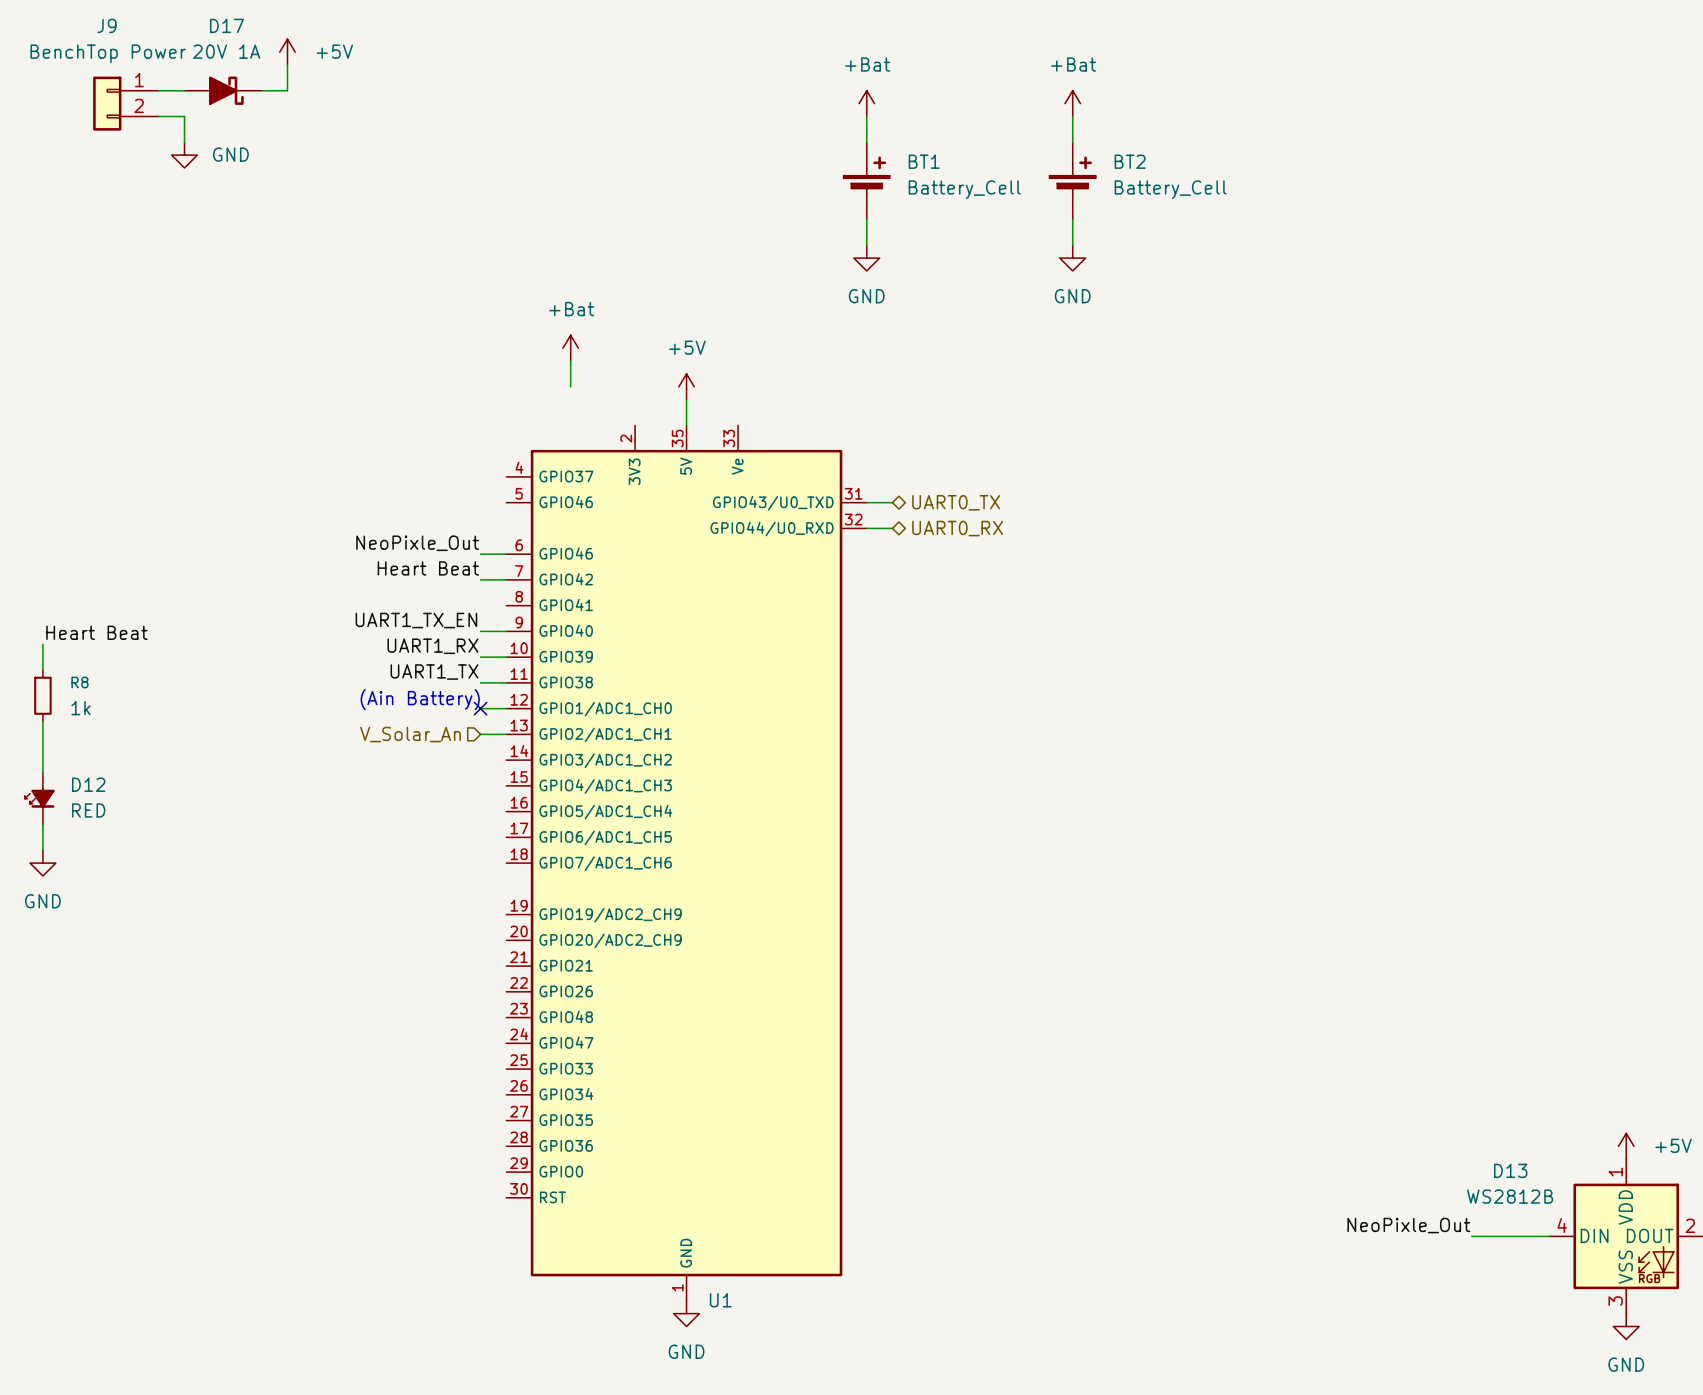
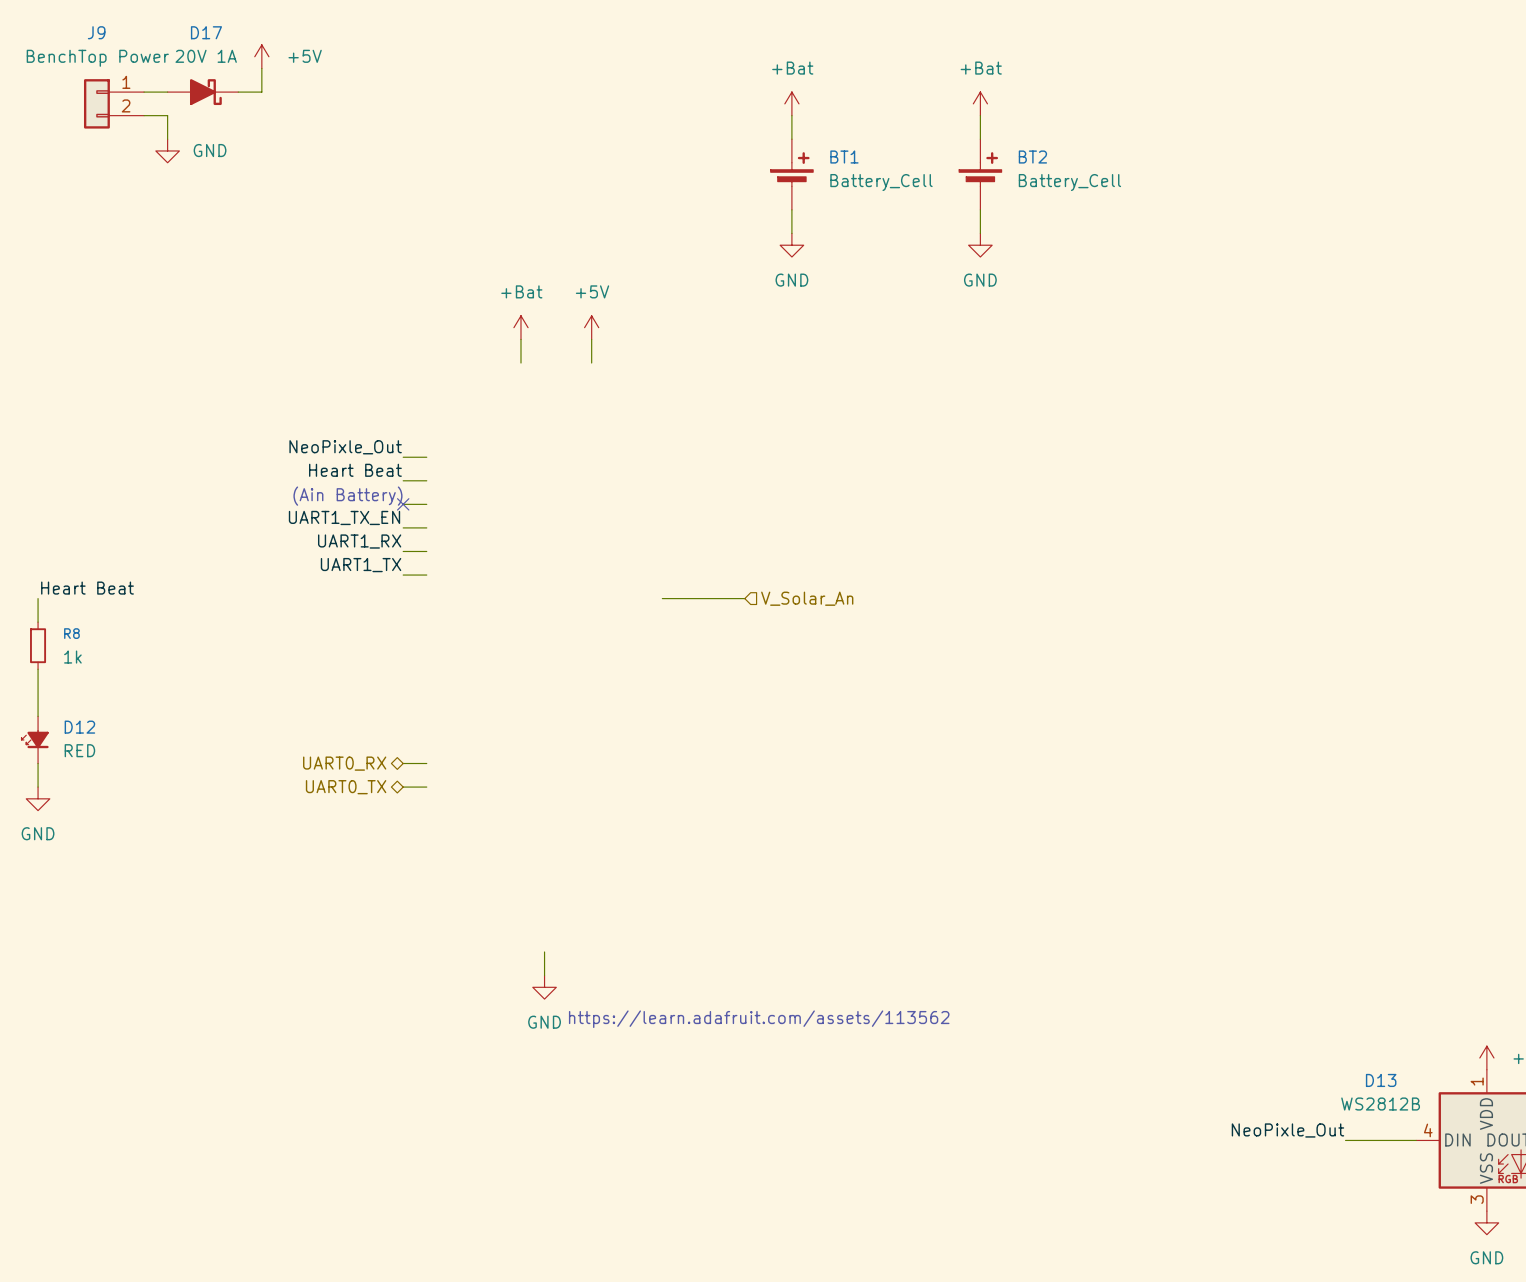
power symbol position: +5V (686, 386) -> +5V (591, 327)
wire: (686, 399) (686, 425) -> (591, 339) (591, 363)
wire: none -> (403, 457) (426, 457)
wire: (866, 502) (892, 502) -> none
hierarchical label: UART0_TX (956, 502) -> none
wire: (866, 528) (892, 528) -> none
hierarchical label: UART0_RX (957, 528) -> none
no-connect mark: none -> (403, 504)
label position: NeoPixle_Out (417, 543) -> NeoPixle_Out (345, 447)
wire: (480, 554) (506, 554) -> (403, 480) (426, 480)
label position: Heart Beat (428, 568) -> Heart Beat (355, 470)
wire: (480, 579) (506, 579) -> (403, 504) (426, 504)
label position: UART1_TX_EN (416, 620) -> UART1_TX_EN (344, 517)
wire: (480, 631) (506, 631) -> (403, 551) (426, 551)
hierarchical label: none -> V_Solar_An (807, 598)
label position: UART1_RX (432, 646) -> UART1_RX (359, 541)
wire: (480, 657) (506, 657) -> (403, 575) (426, 575)
label position: UART1_TX (434, 672) -> UART1_TX (361, 565)
wire: (480, 682) (506, 682) -> (403, 527) (426, 527)
text position: (Ain Battery) (420, 699) -> (Ain Battery) (347, 496)
wire: (480, 708) (506, 708) -> (403, 763) (426, 763)
no-connect mark: (480, 708) -> none
hierarchical label: V_Solar_An (410, 734) -> none
wire: (480, 734) (506, 734) -> (403, 787) (426, 787)
hierarchical label: none -> UART0_RX (344, 763)
hierarchical label: none -> UART0_TX (346, 787)
U1: (686, 863) -> none
power symbol: none -> GND (544, 987)
text: none -> https://learn.adafruit.com/assets/113562 (759, 1019)
power symbol: GND (686, 1313) -> none

